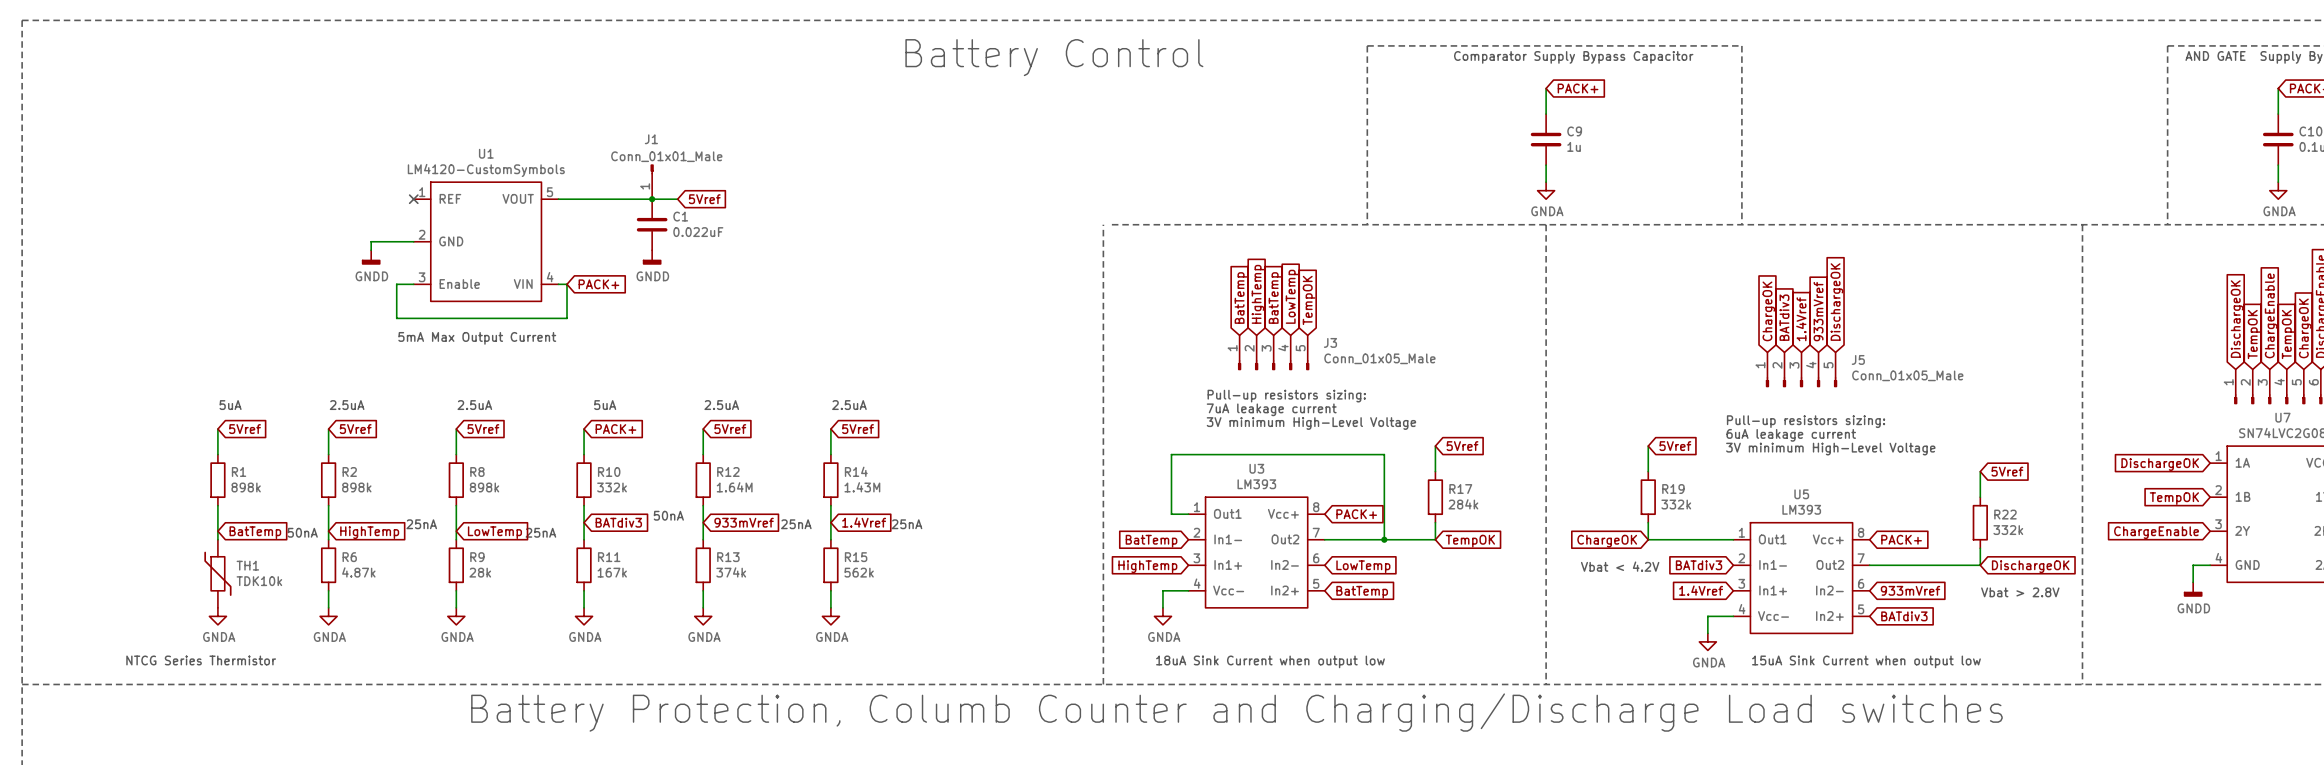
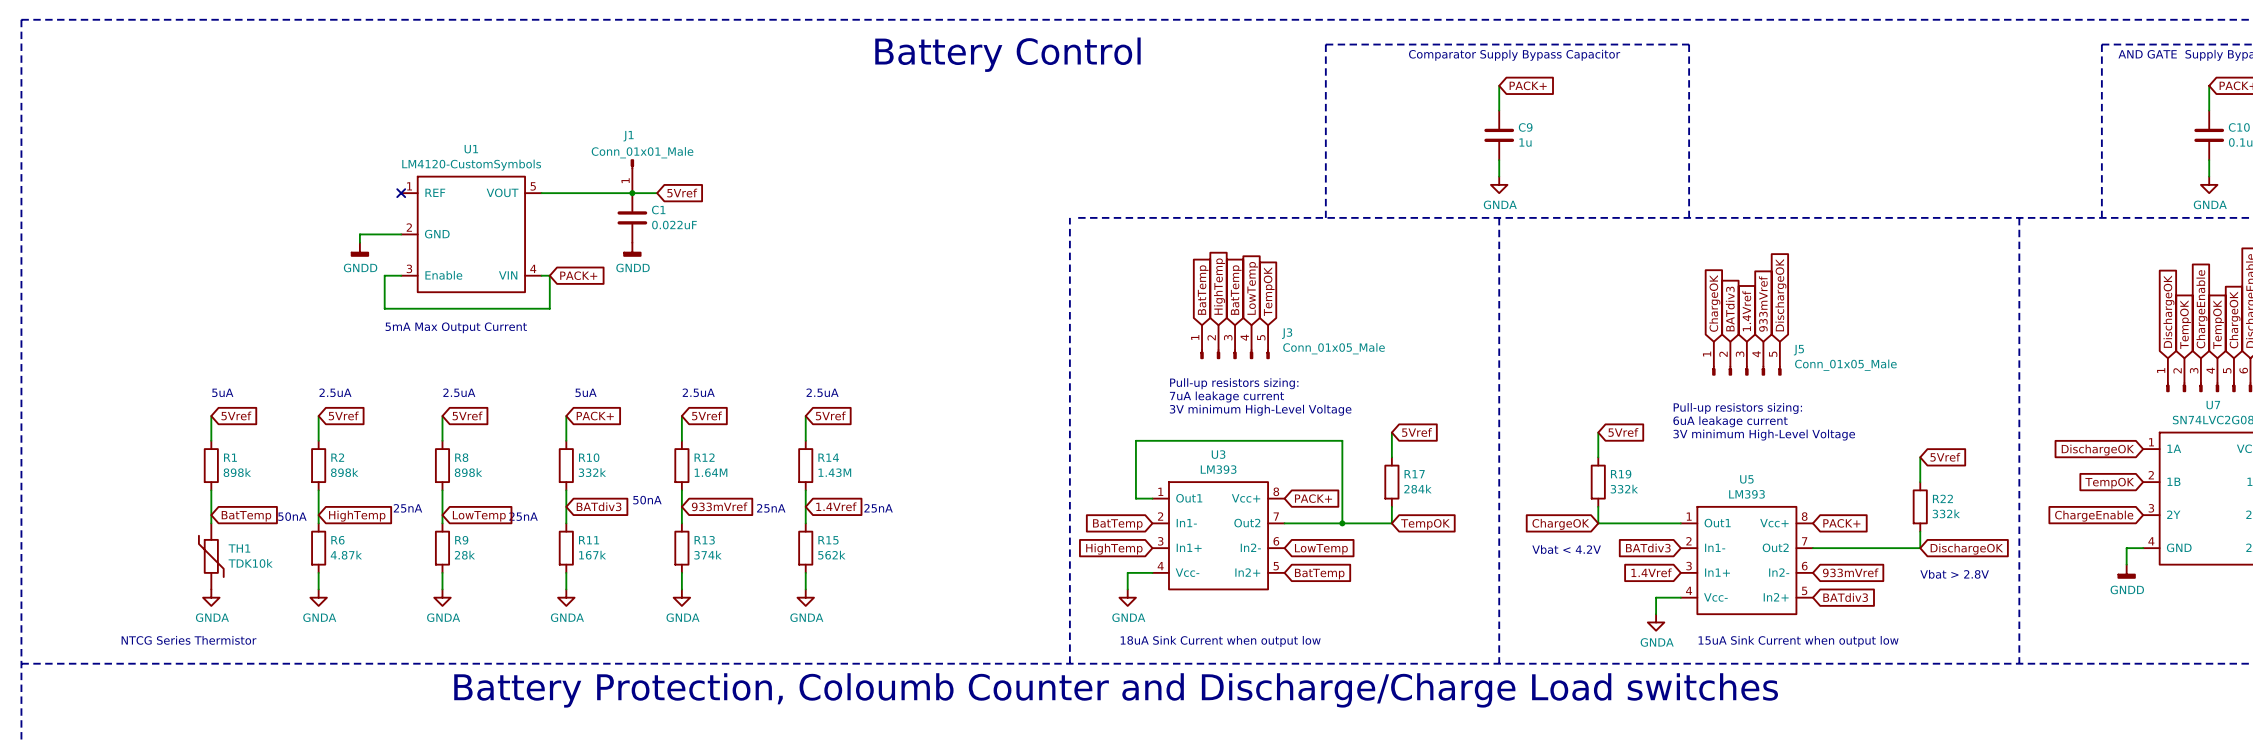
text: Battery Protection, Columb Counter and Charging/Discharge Load switches (1236, 712) -> Battery Protection, Coloumb Counter and Discharge/Charge Load switches (1116, 690)

